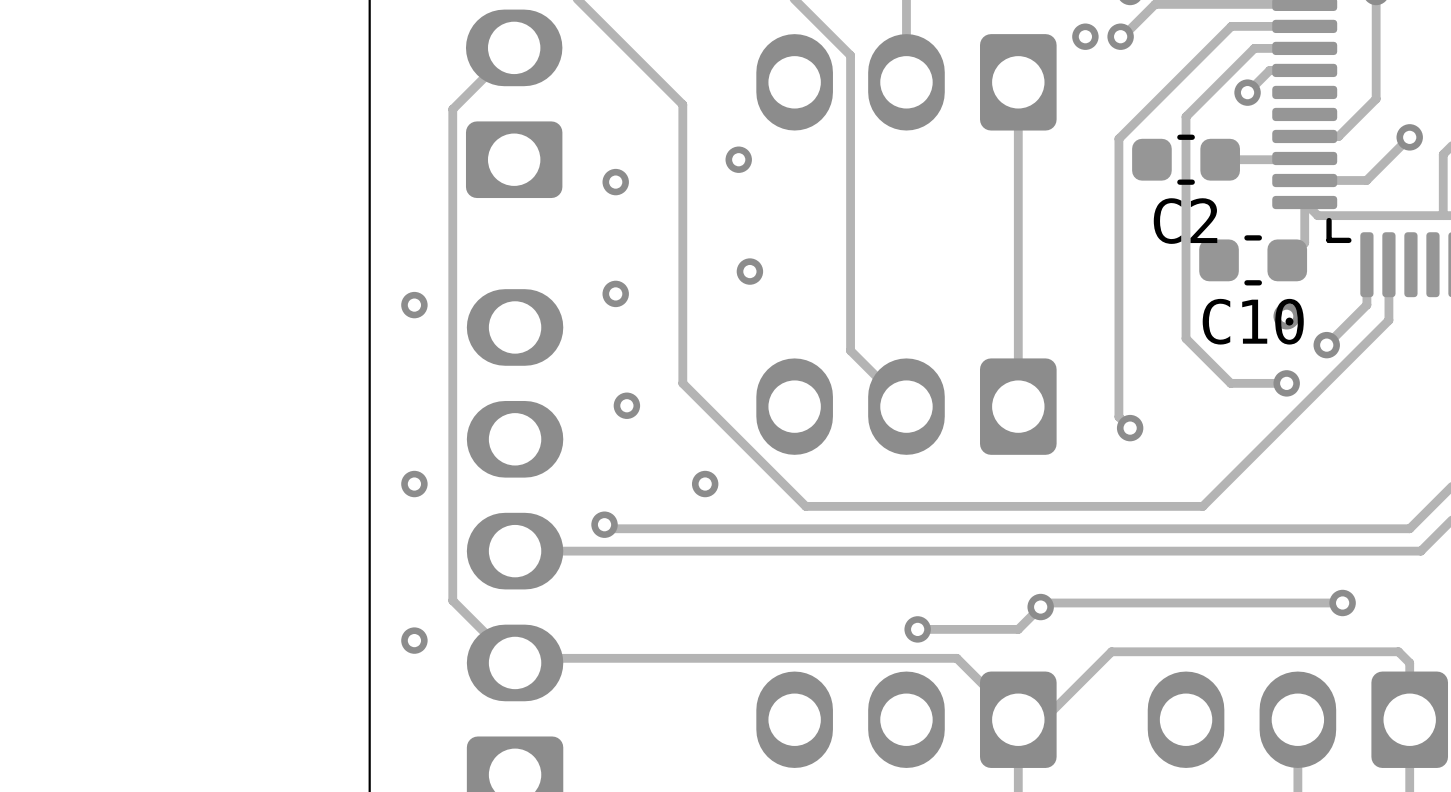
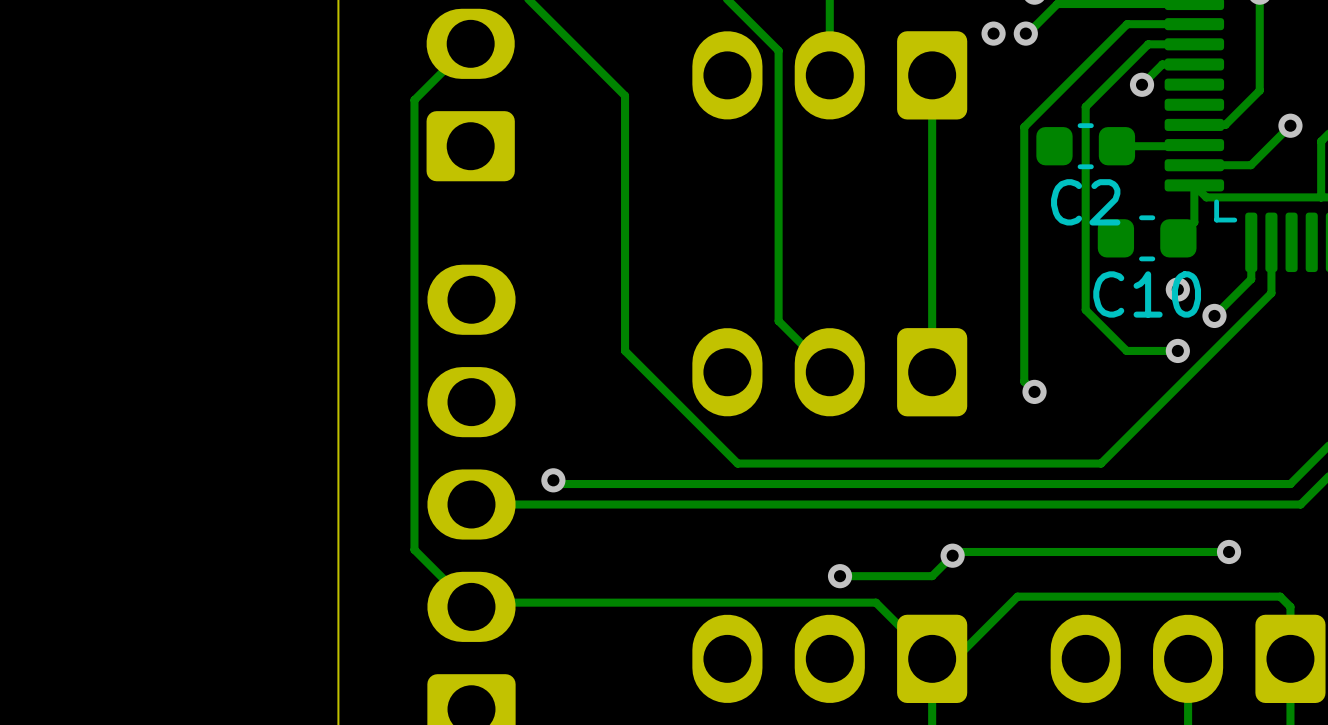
via: (738, 159) -> none
via: (615, 182) -> none
via: (749, 271) -> none
via: (615, 293) -> none
via: (414, 305) -> none
via: (626, 405) -> none
via: (414, 484) -> none
via: (705, 484) -> none
via: (414, 640) -> none

